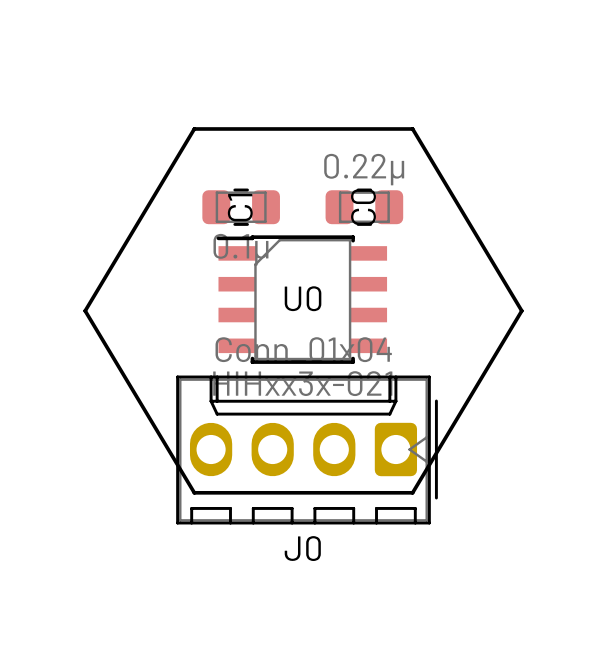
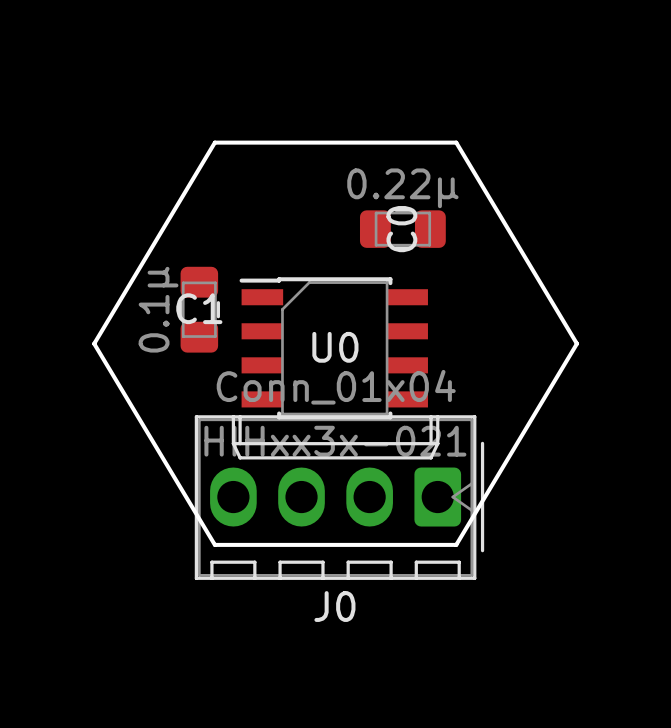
C1 rotation: 0° (241, 207) -> 90° clockwise (199, 309)
C1 position: (241, 207) -> (199, 309)
U0 position: (301, 299) -> (333, 348)

